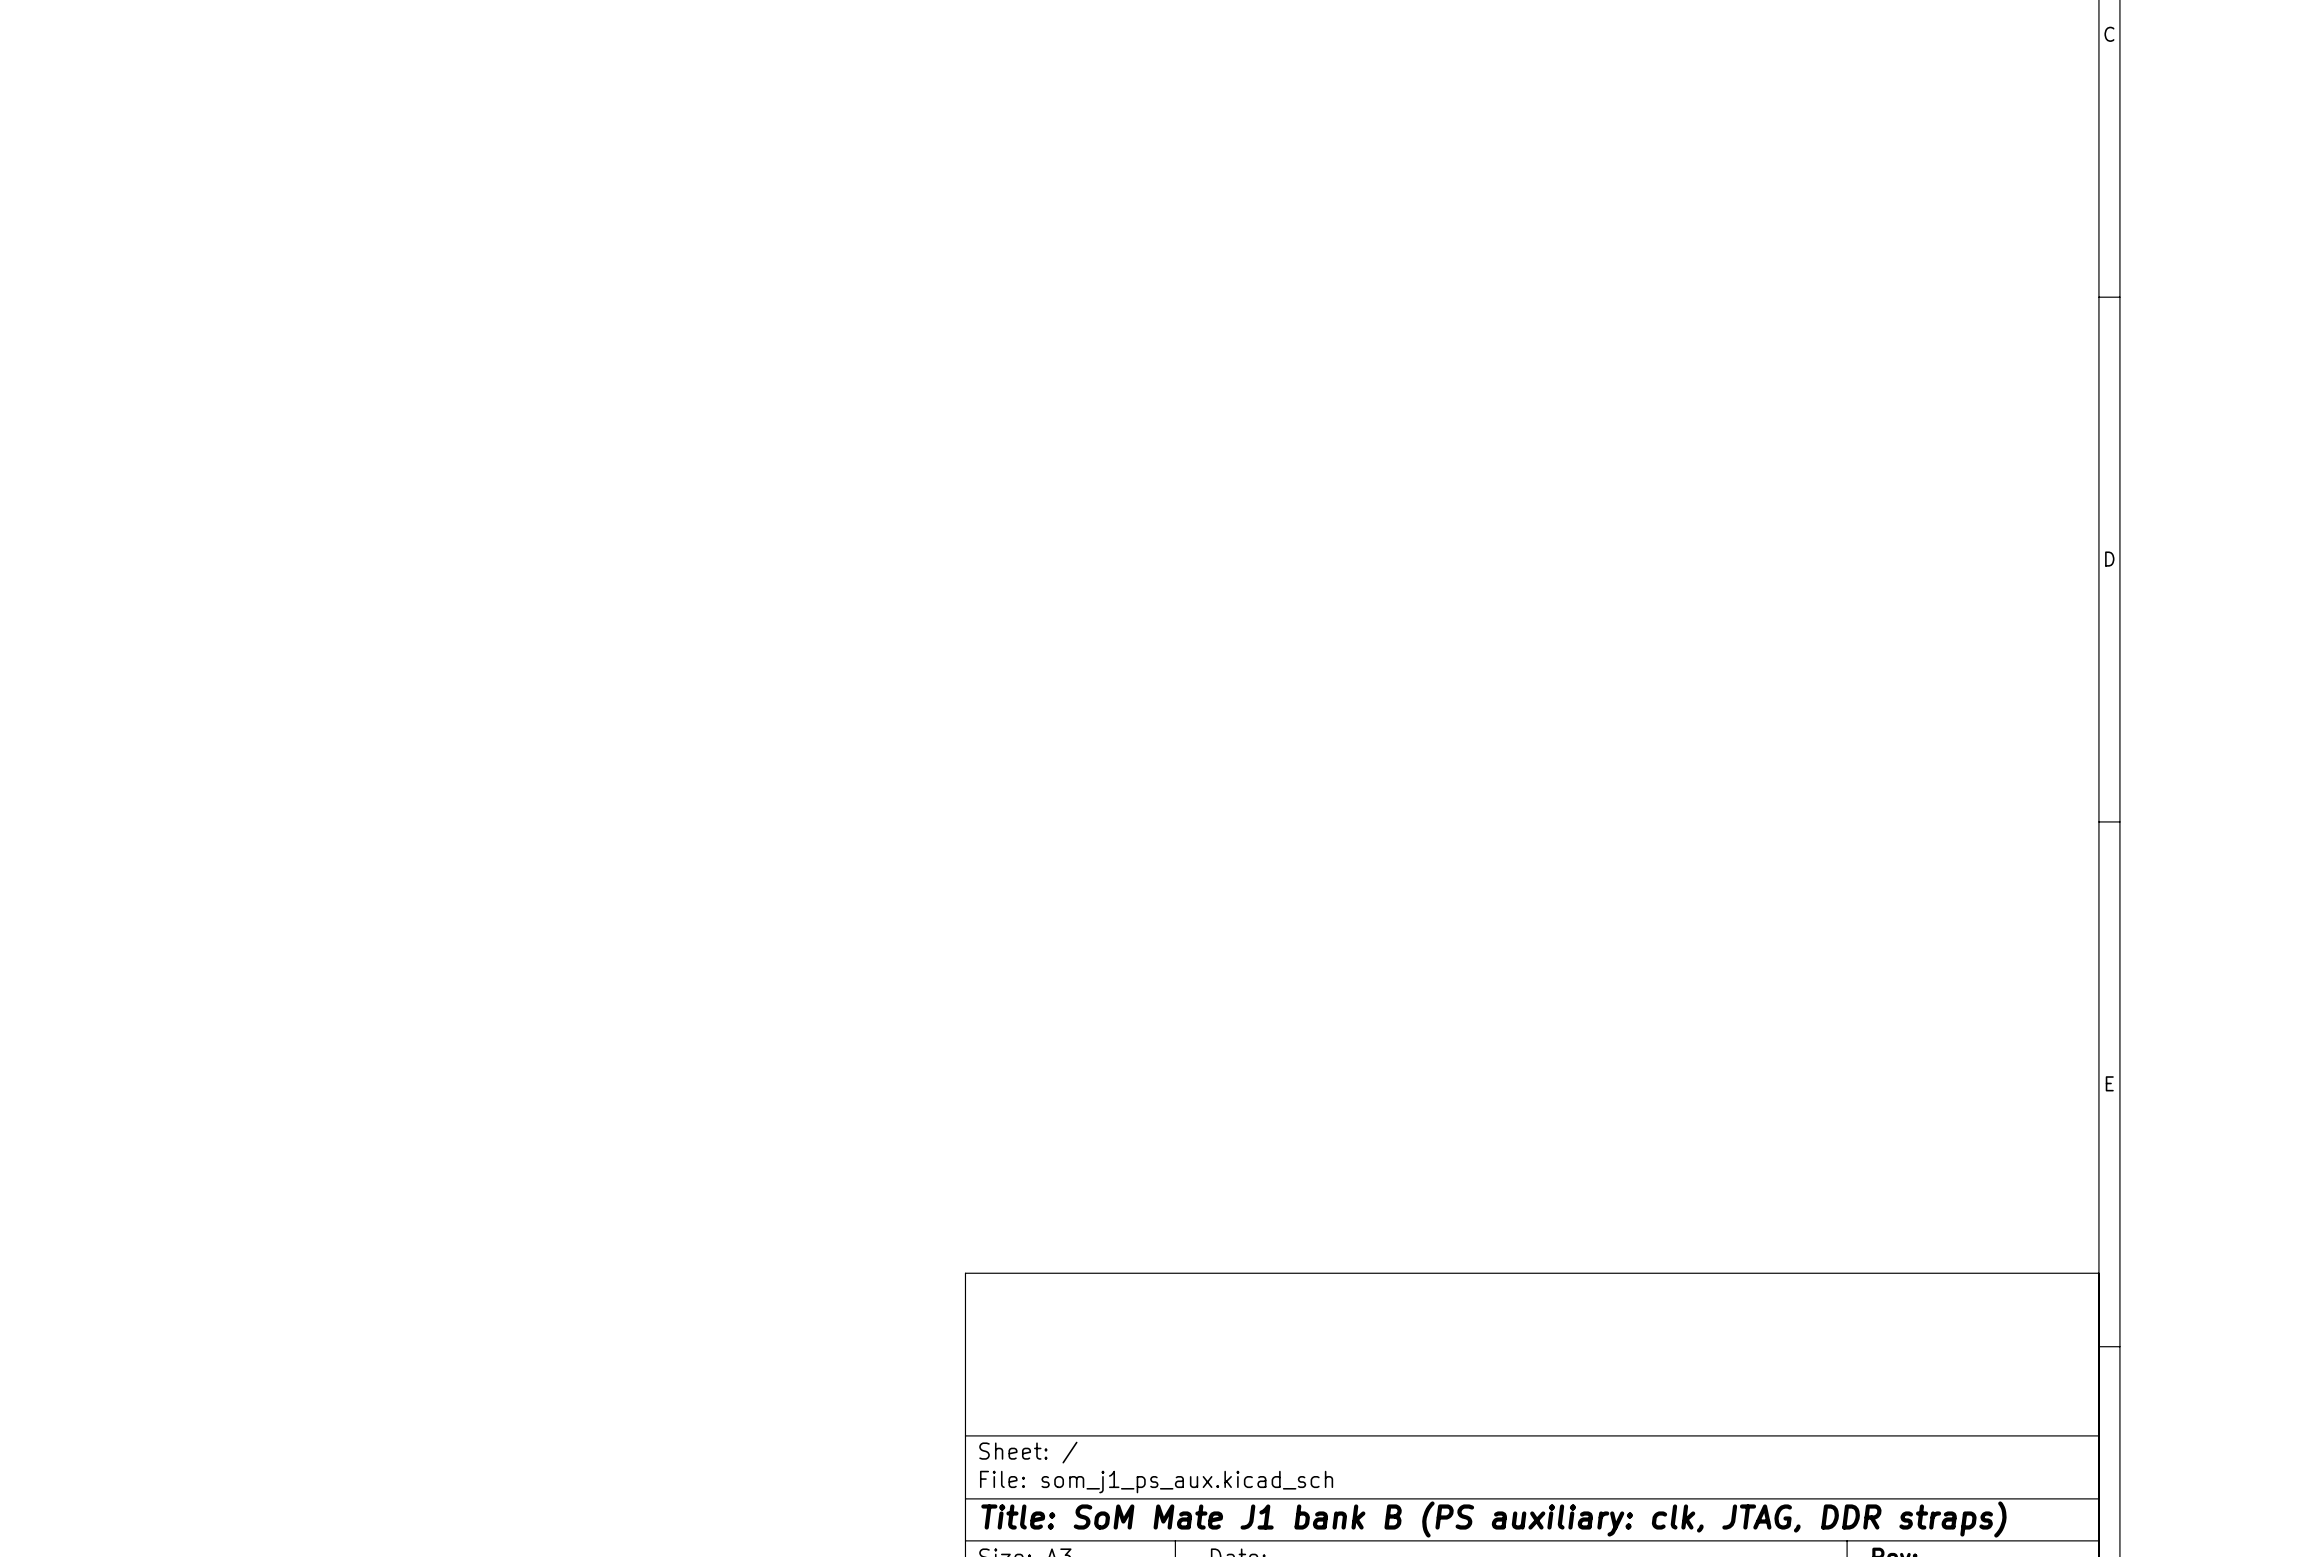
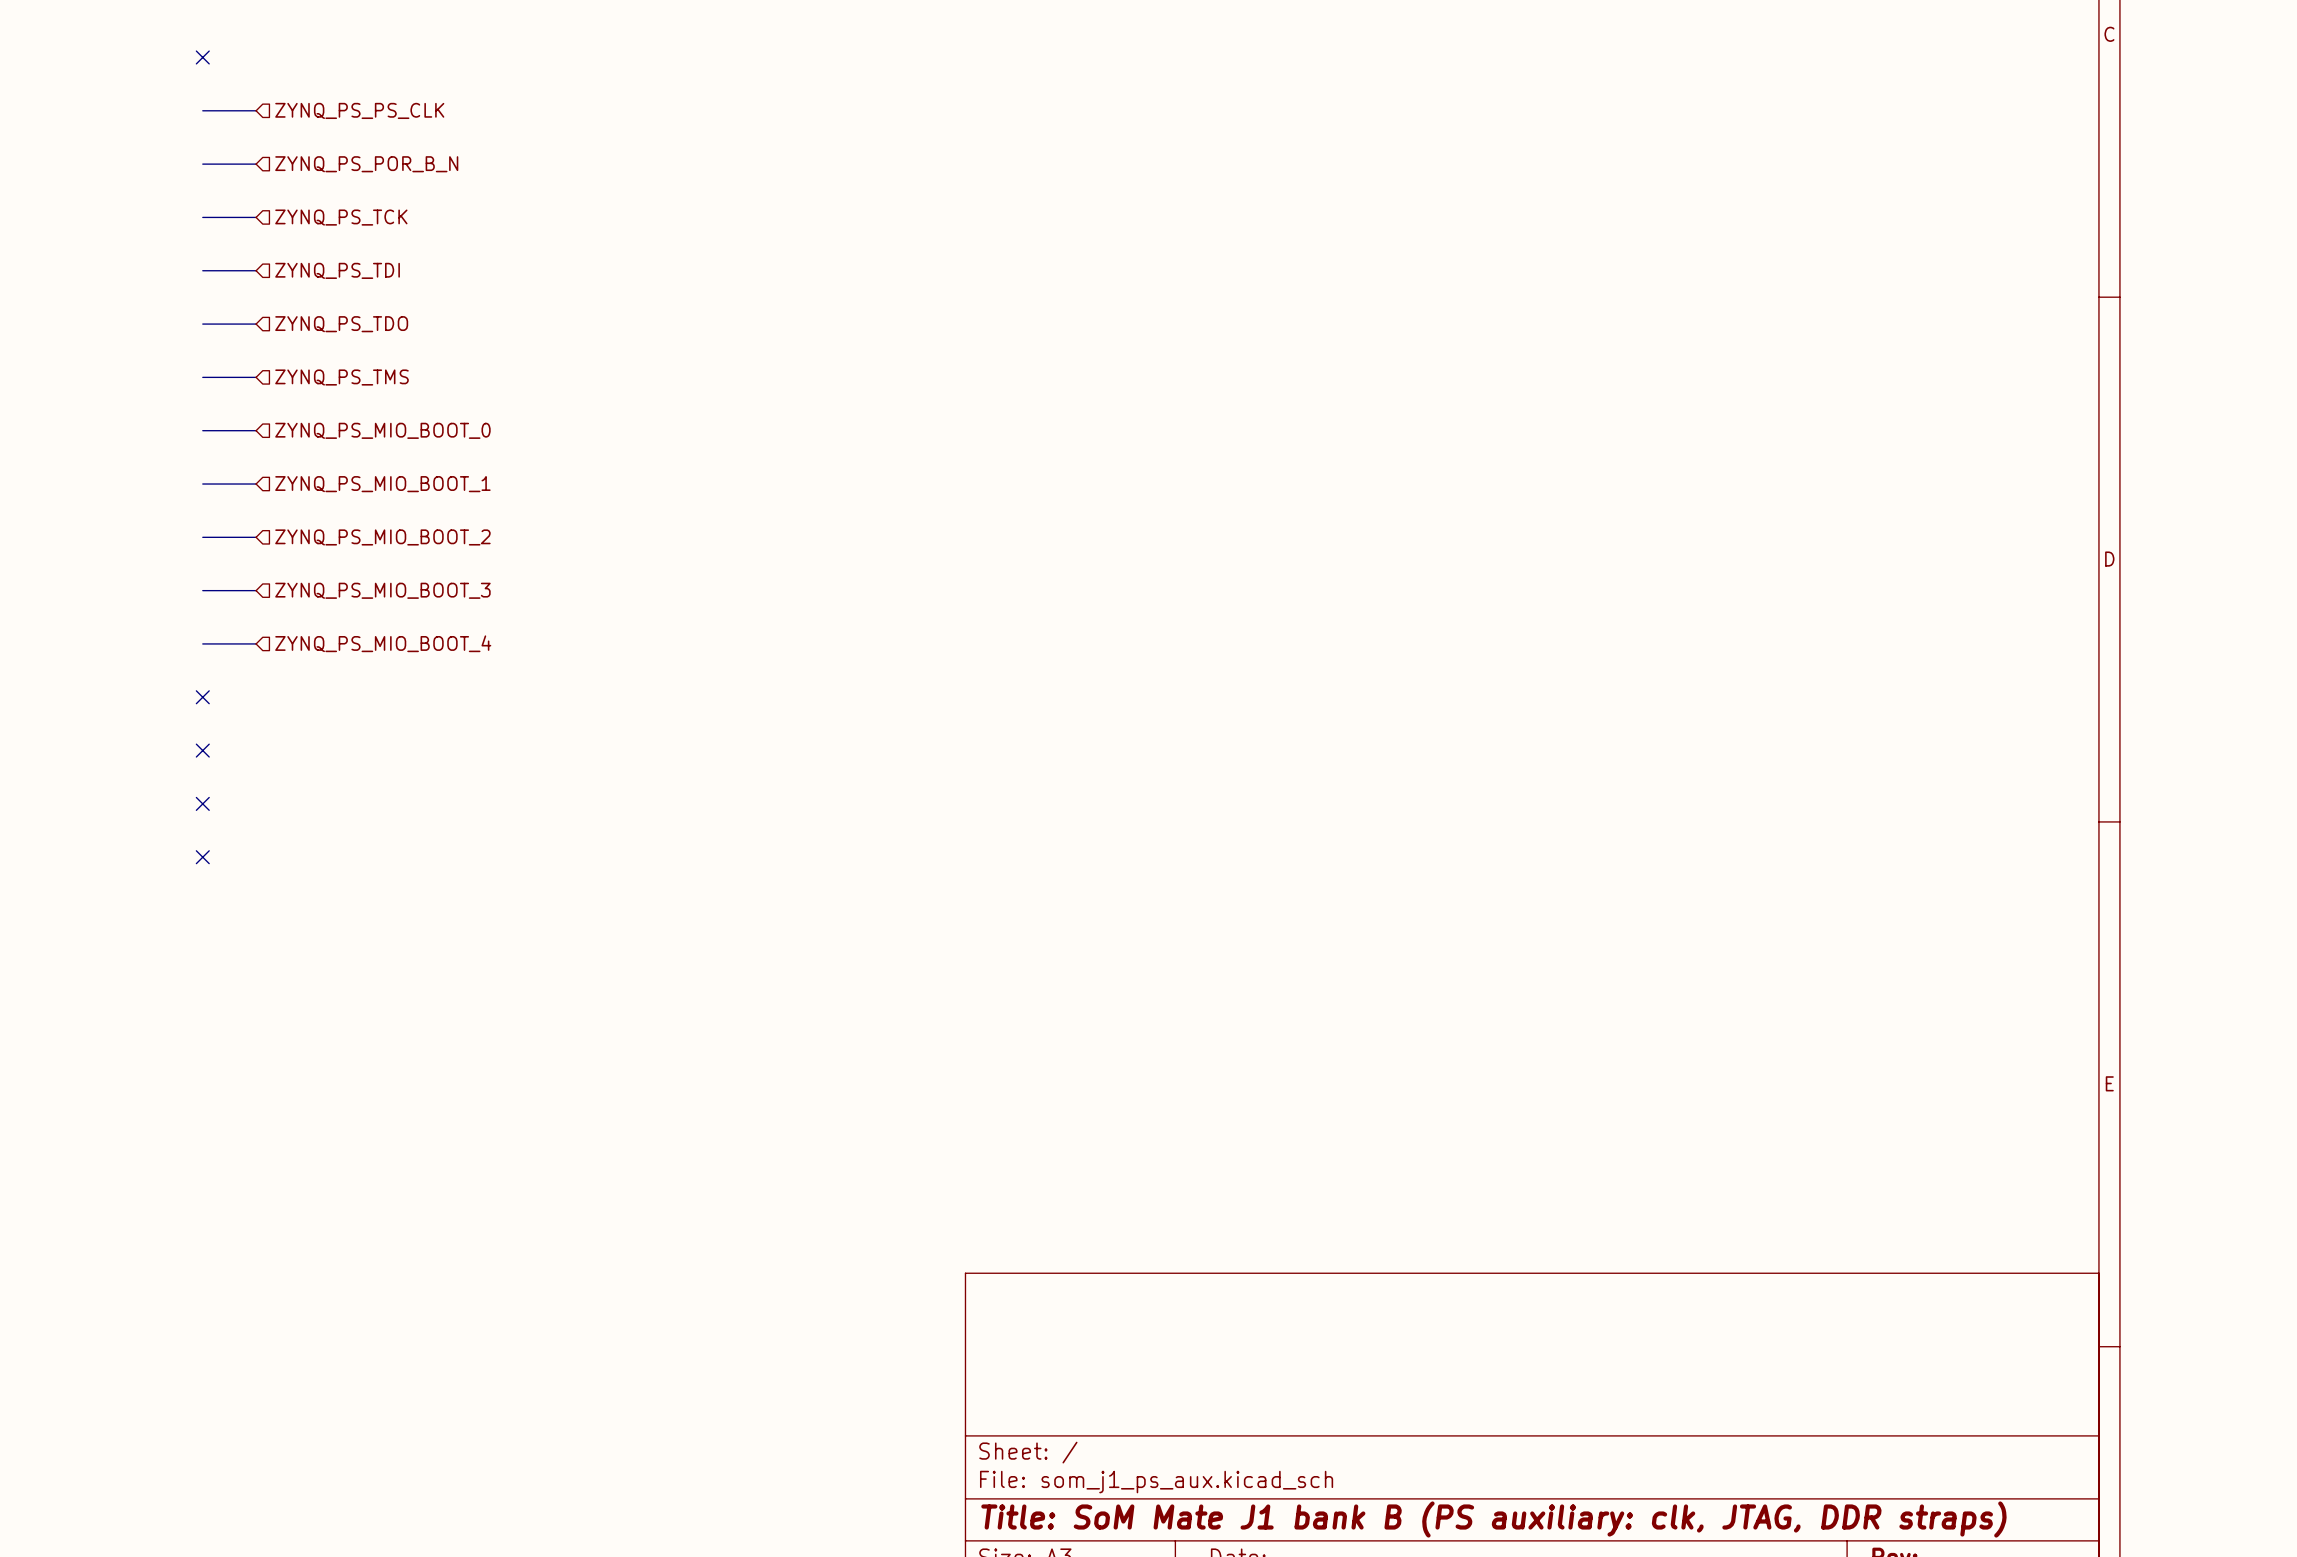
no-connect mark: none -> (202, 57)
wire: none -> (202, 110) (256, 110)
hierarchical label: none -> ZYNQ_PS_PS_CLK (359, 110)
wire: none -> (202, 164) (256, 164)
hierarchical label: none -> ZYNQ_PS_POR_B_N (366, 164)
wire: none -> (202, 217) (256, 217)
hierarchical label: none -> ZYNQ_PS_TCK (341, 217)
wire: none -> (202, 270) (256, 270)
hierarchical label: none -> ZYNQ_PS_TDI (337, 270)
wire: none -> (202, 324) (256, 324)
hierarchical label: none -> ZYNQ_PS_TDO (341, 324)
wire: none -> (202, 377) (256, 377)
hierarchical label: none -> ZYNQ_PS_TMS (341, 377)
wire: none -> (202, 430) (256, 430)
hierarchical label: none -> ZYNQ_PS_MIO_BOOT_0 (382, 430)
wire: none -> (202, 484) (256, 484)
hierarchical label: none -> ZYNQ_PS_MIO_BOOT_1 (382, 484)
wire: none -> (202, 537) (256, 537)
hierarchical label: none -> ZYNQ_PS_MIO_BOOT_2 (382, 537)
wire: none -> (202, 590) (256, 590)
hierarchical label: none -> ZYNQ_PS_MIO_BOOT_3 (382, 590)
wire: none -> (202, 643) (256, 643)
hierarchical label: none -> ZYNQ_PS_MIO_BOOT_4 (383, 643)
no-connect mark: none -> (202, 697)
no-connect mark: none -> (202, 750)
no-connect mark: none -> (202, 803)
no-connect mark: none -> (202, 857)

